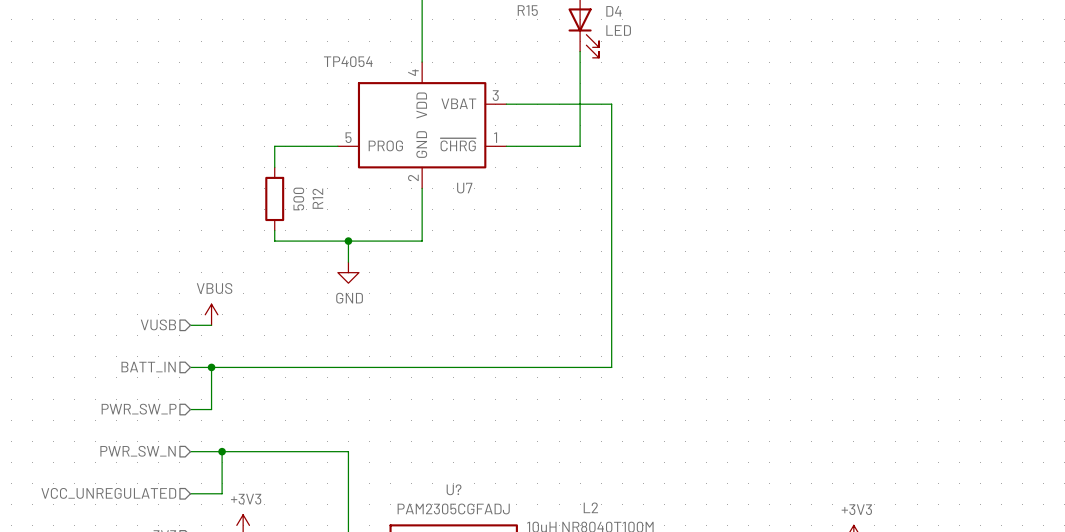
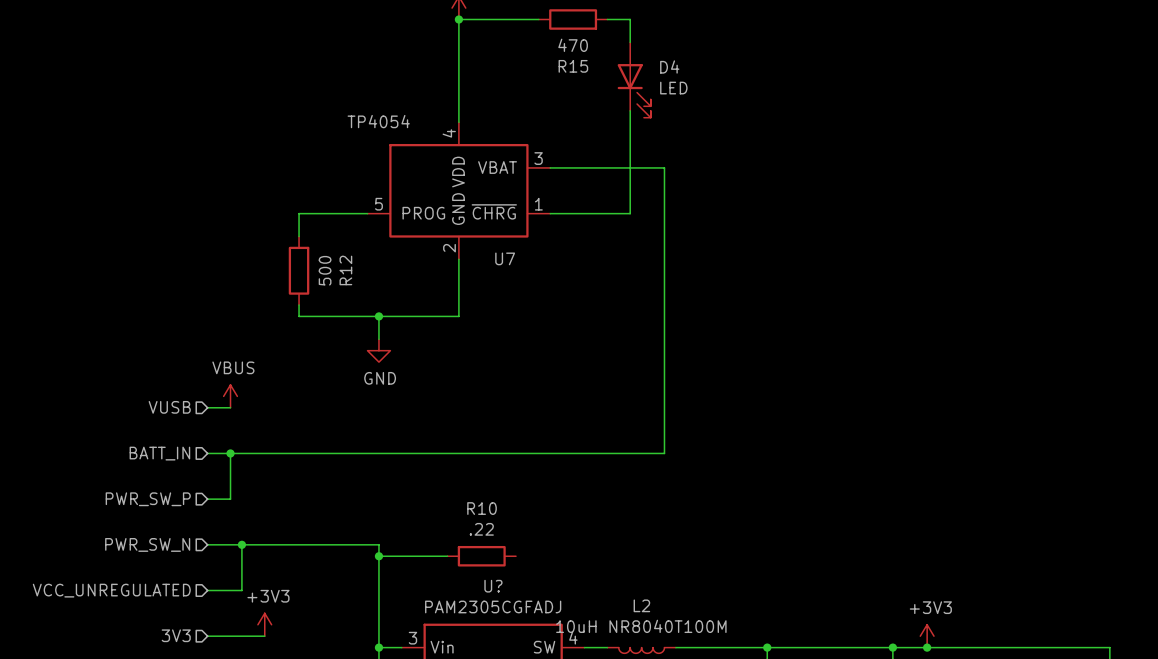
wire: none -> (378, 556) (447, 556)
junction: none -> (378, 556)
R10: none -> .22 (481, 556)

